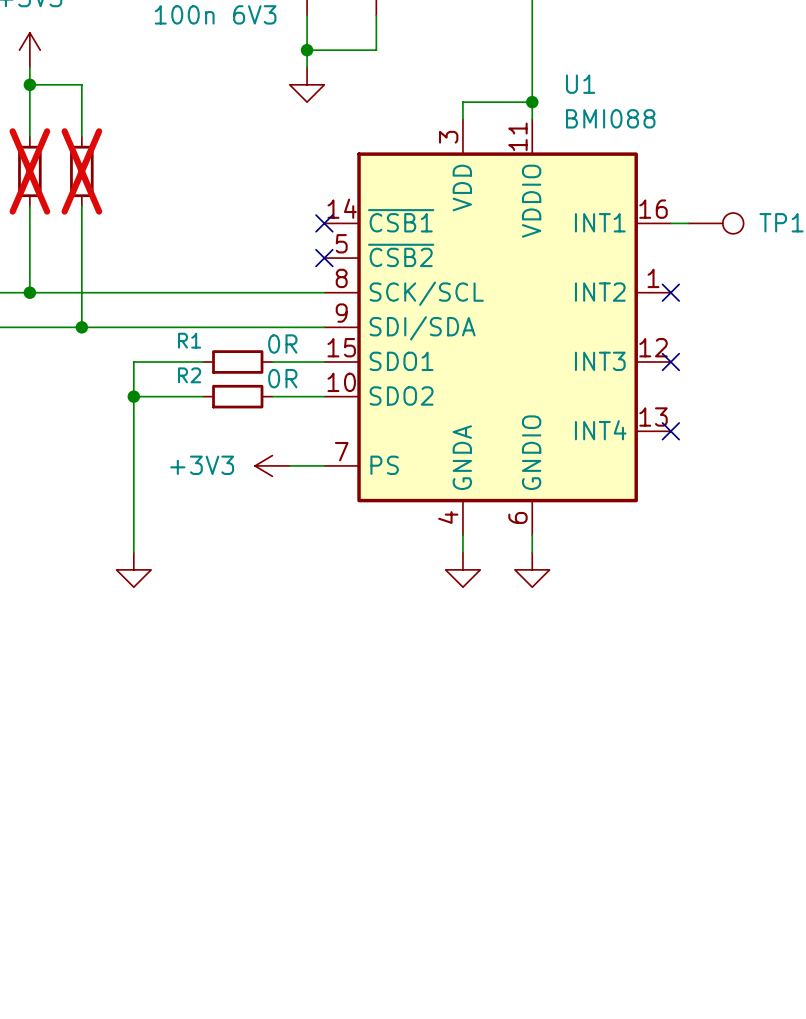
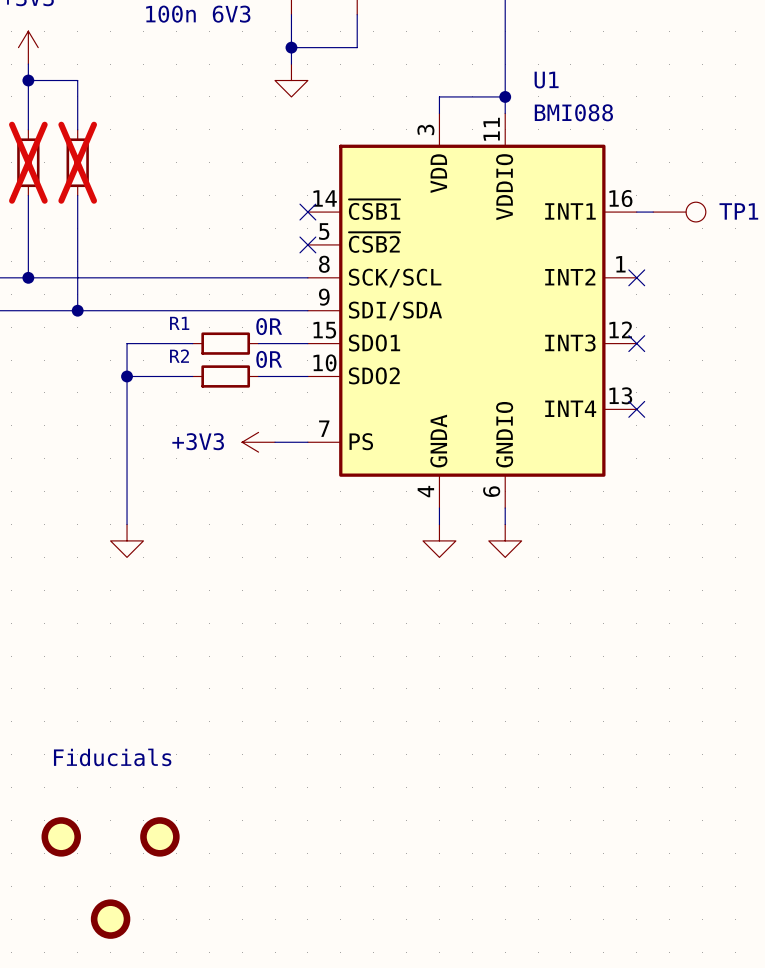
text: none -> Fiducials (112, 757)
part: none -> (61, 836)
part: none -> (159, 836)
part: none -> (110, 919)

